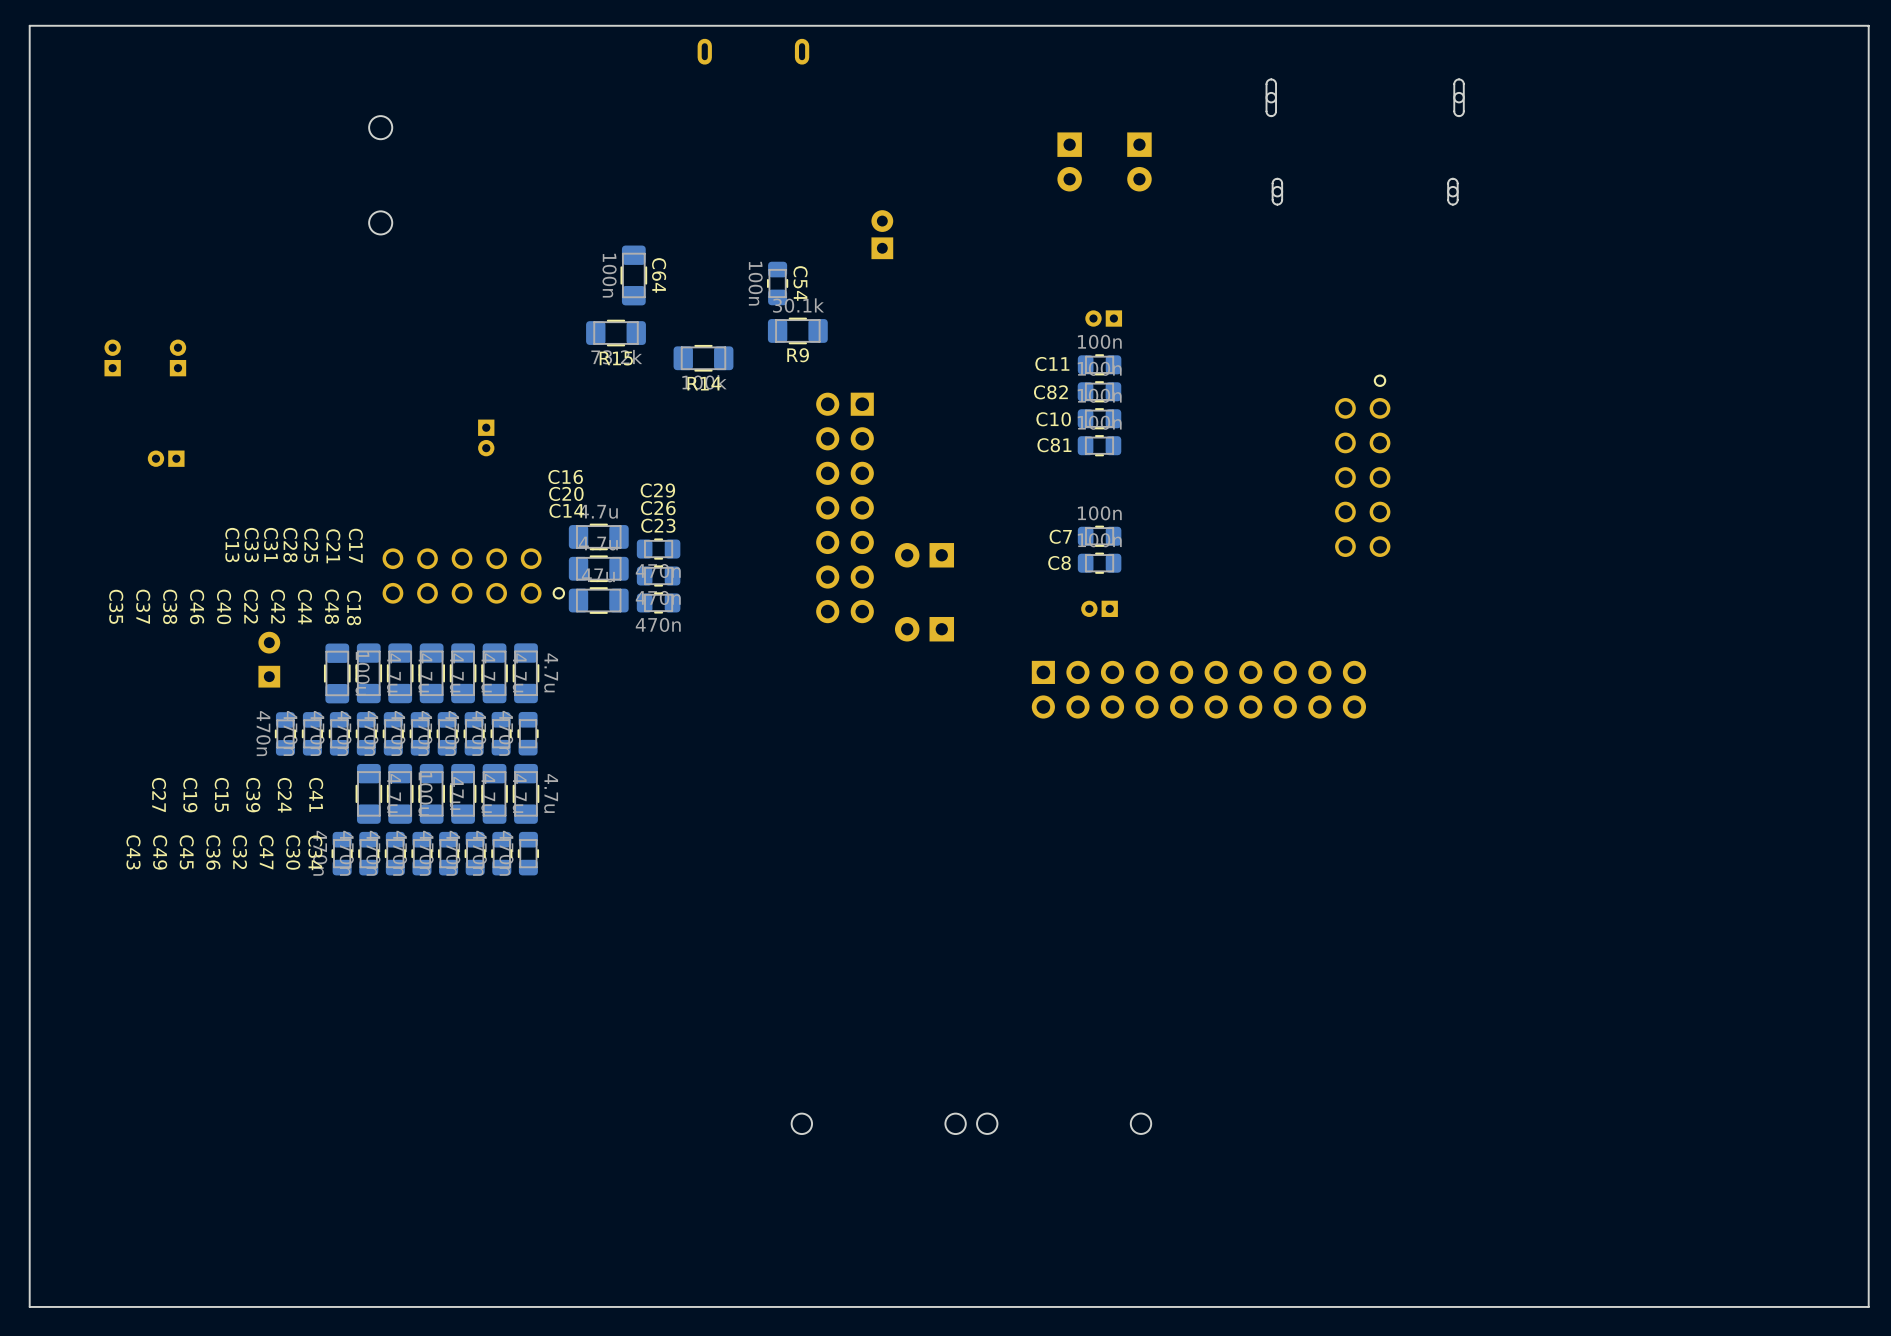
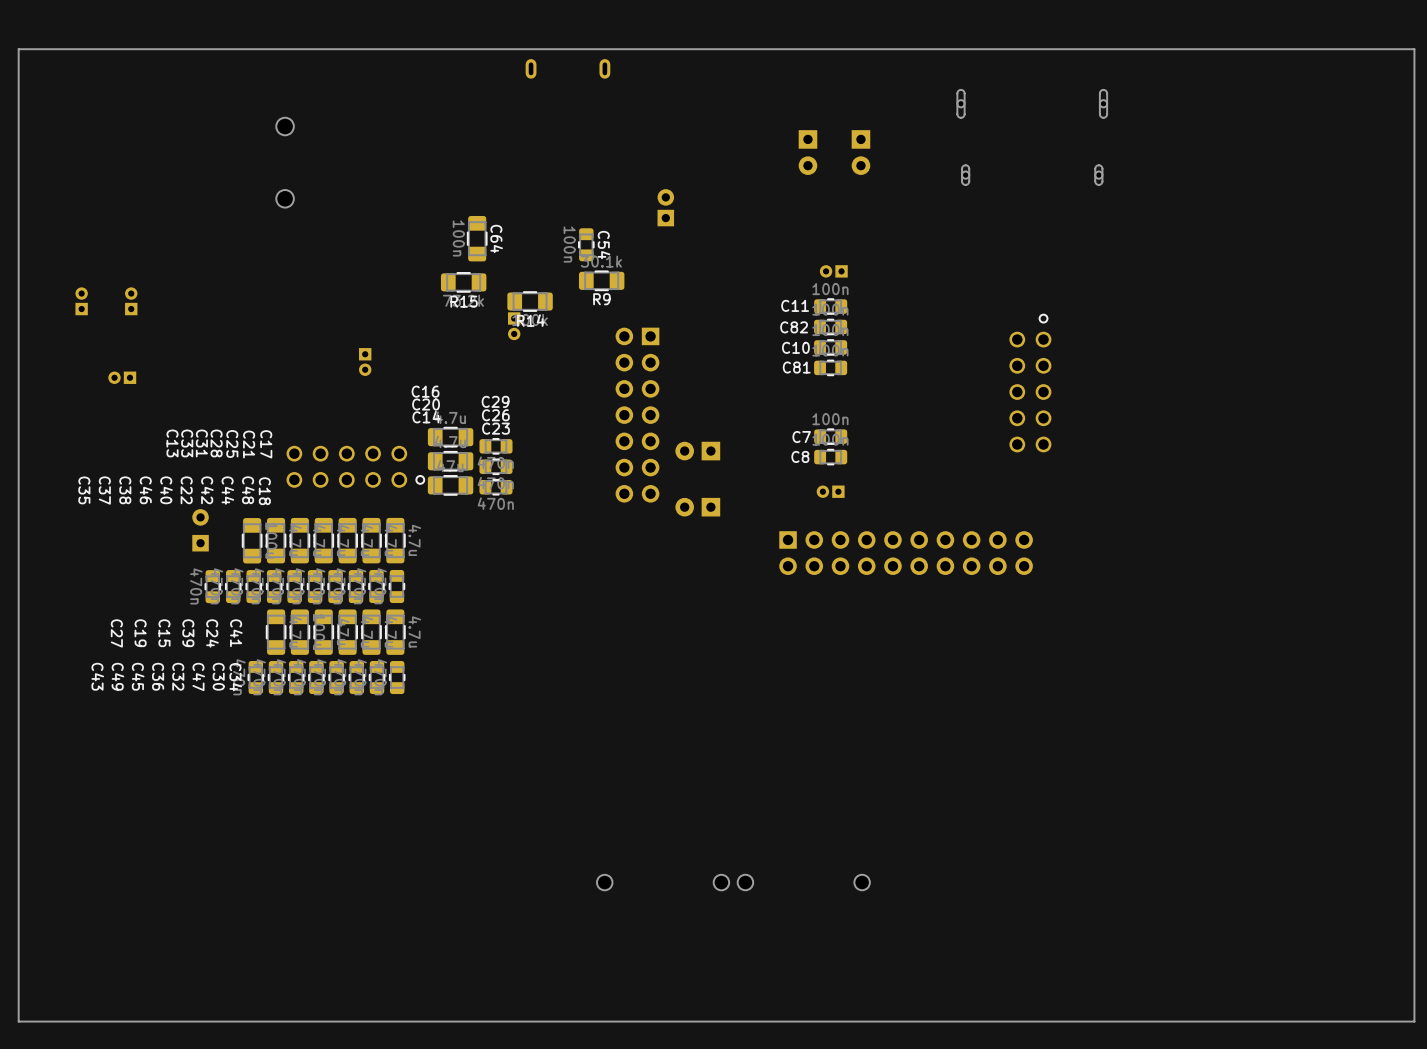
part: none -> (514, 326)

